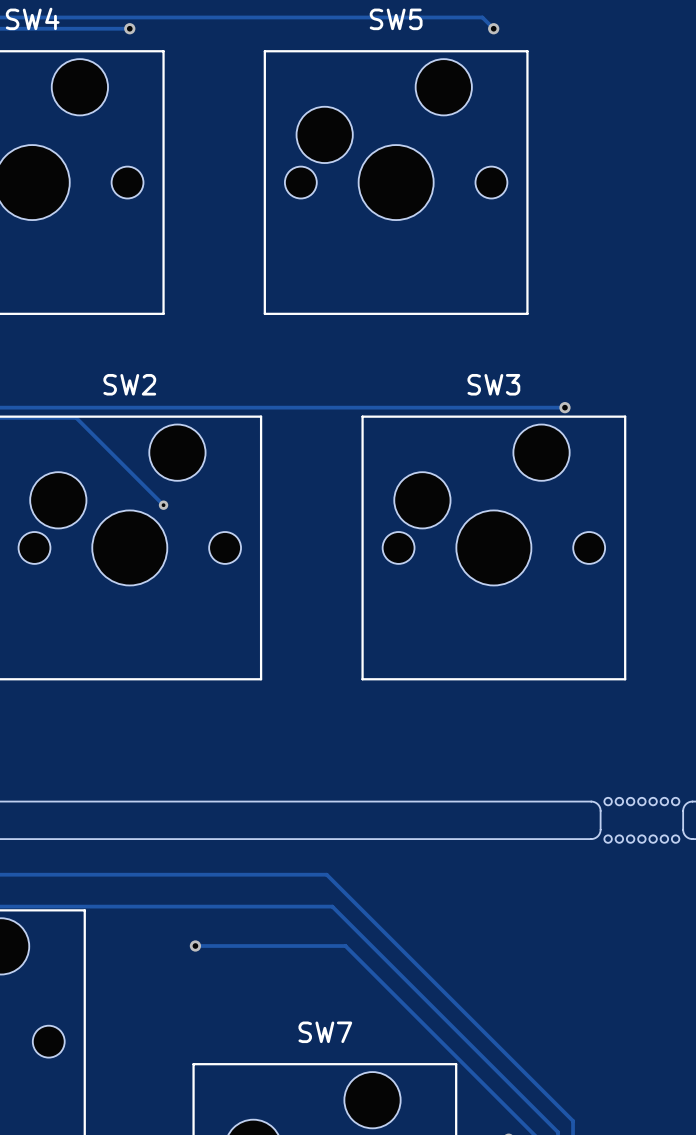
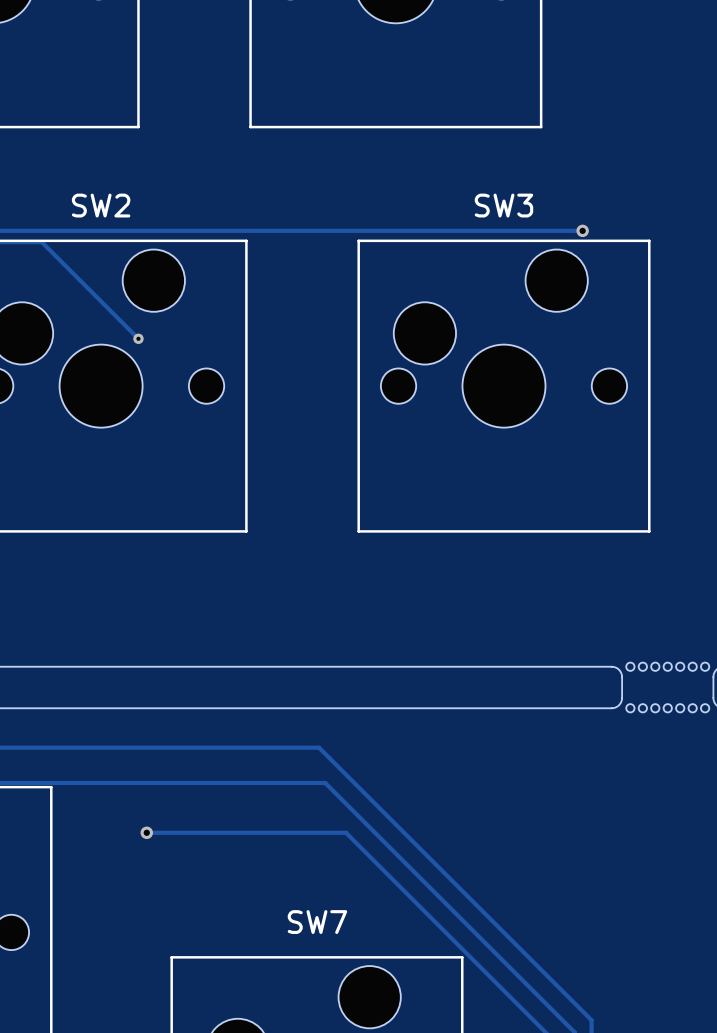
track: (195, 946) (345, 946) (351, 951) -> (146, 832) (346, 832)
via position: (195, 946) -> (146, 832)

